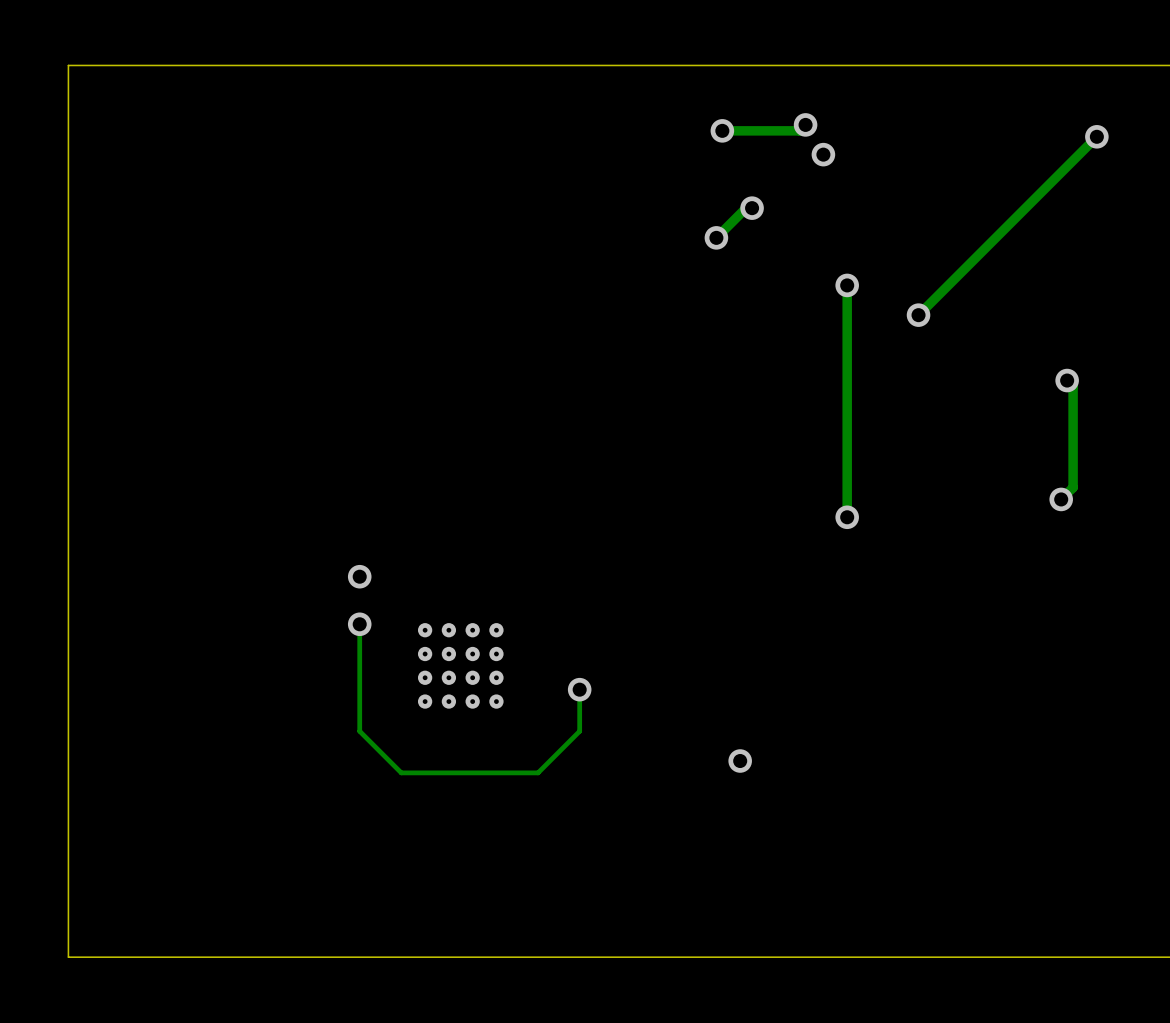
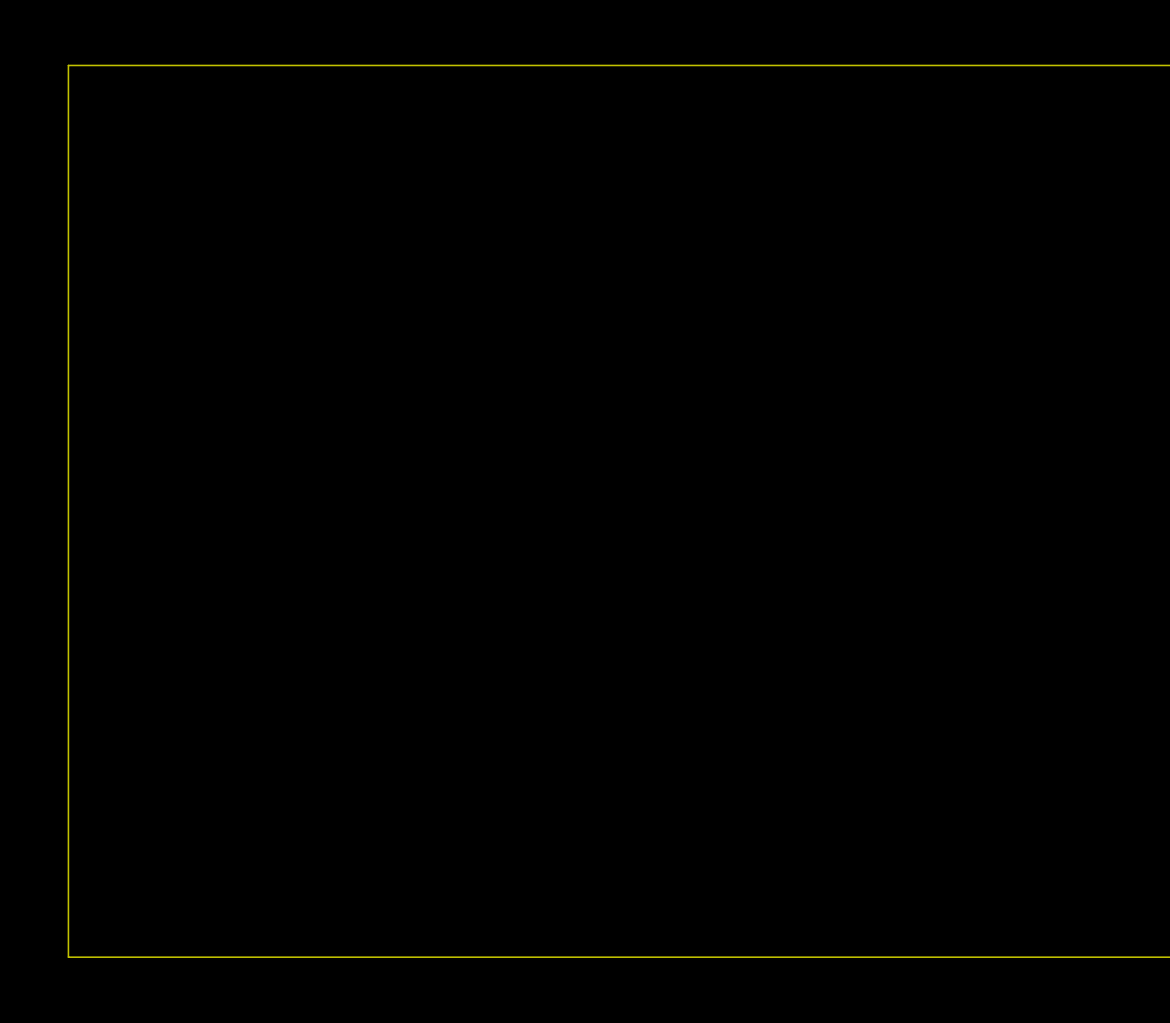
track: (805, 124) (799, 130) (722, 130) -> none
via: (805, 124) -> none
via: (722, 130) -> none
track: (1096, 136) (918, 315) -> none
via: (1096, 136) -> none
via: (823, 154) -> none
track: (752, 208) (746, 208) (716, 237) -> none
via: (752, 208) -> none
via: (716, 237) -> none
track: (847, 285) (847, 517) -> none
via: (847, 285) -> none
via: (918, 315) -> none
track: (1067, 380) (1073, 386) (1073, 487) (1061, 499) -> none
via: (1067, 380) -> none
via: (1061, 499) -> none
via: (847, 517) -> none
via: (359, 576) -> none
track: (359, 624) (359, 731) (401, 772) (538, 772) (579, 731) (579, 689) -> none
via: (359, 624) -> none
via: (425, 630) -> none
via: (448, 630) -> none
via: (472, 630) -> none
via: (496, 630) -> none
via: (425, 654) -> none
via: (448, 654) -> none
via: (472, 654) -> none
via: (496, 654) -> none
via: (425, 677) -> none
via: (448, 677) -> none
via: (472, 677) -> none
via: (496, 677) -> none
via: (579, 689) -> none
via: (425, 701) -> none
via: (448, 701) -> none
via: (472, 701) -> none
via: (496, 701) -> none
via: (740, 761) -> none

